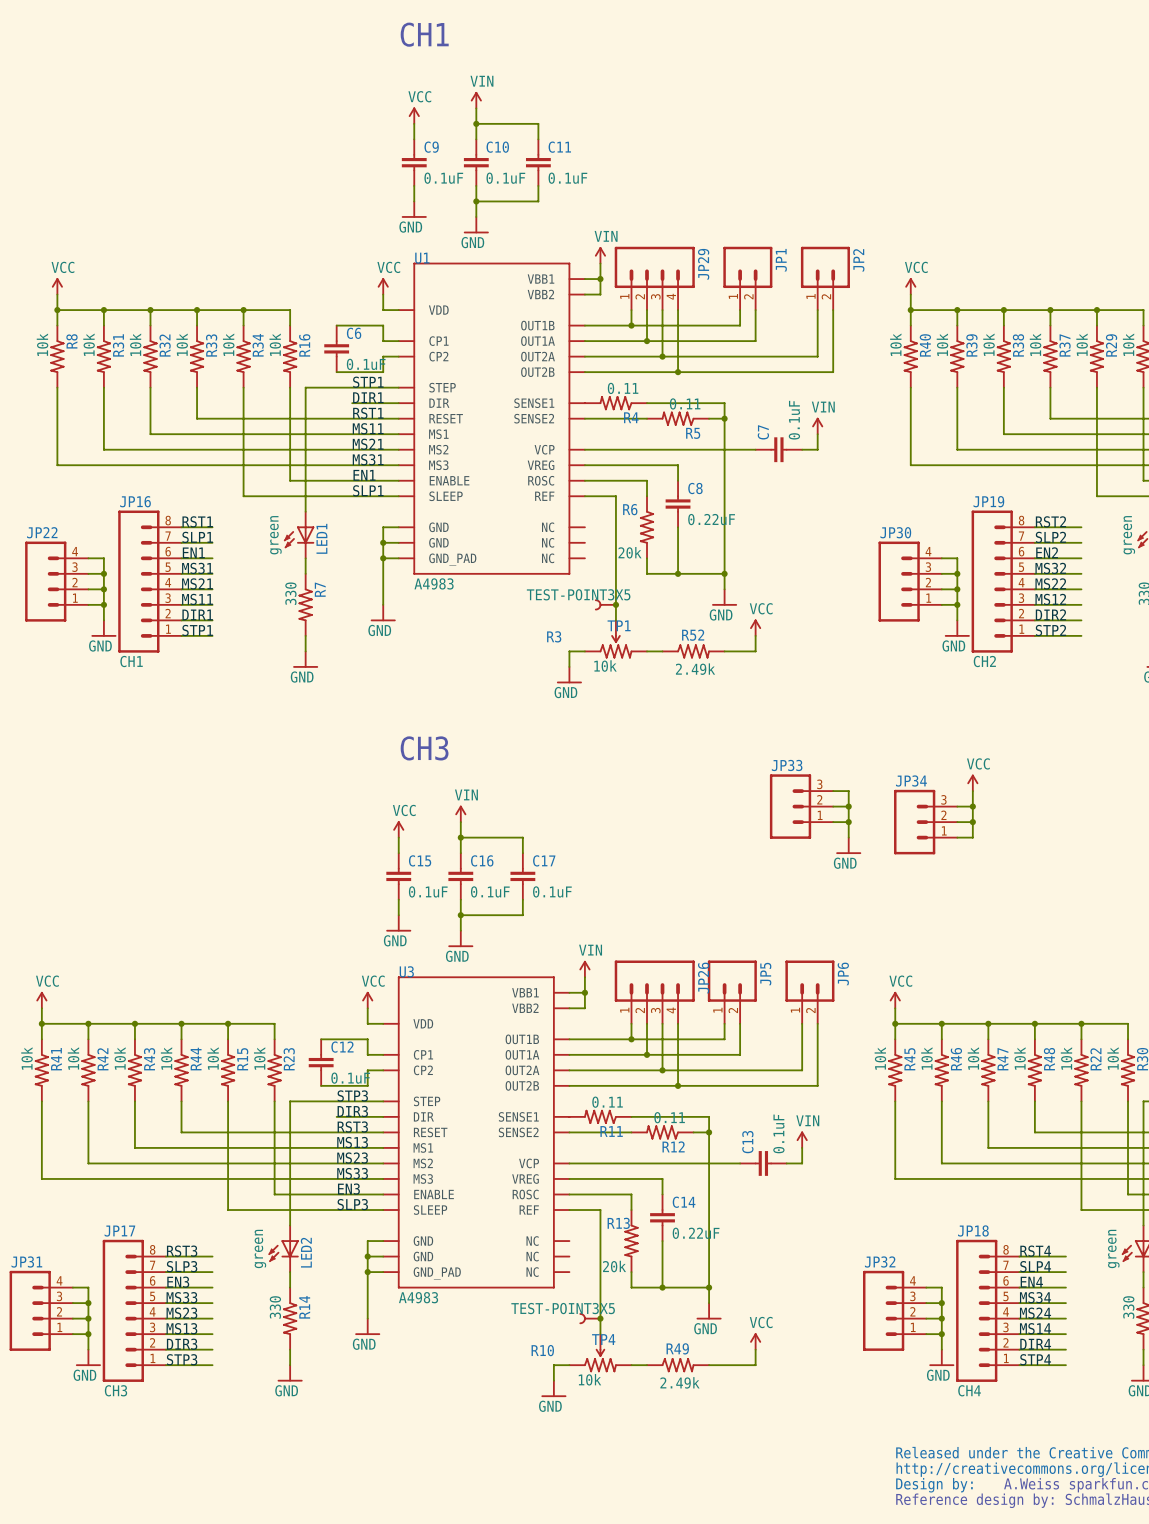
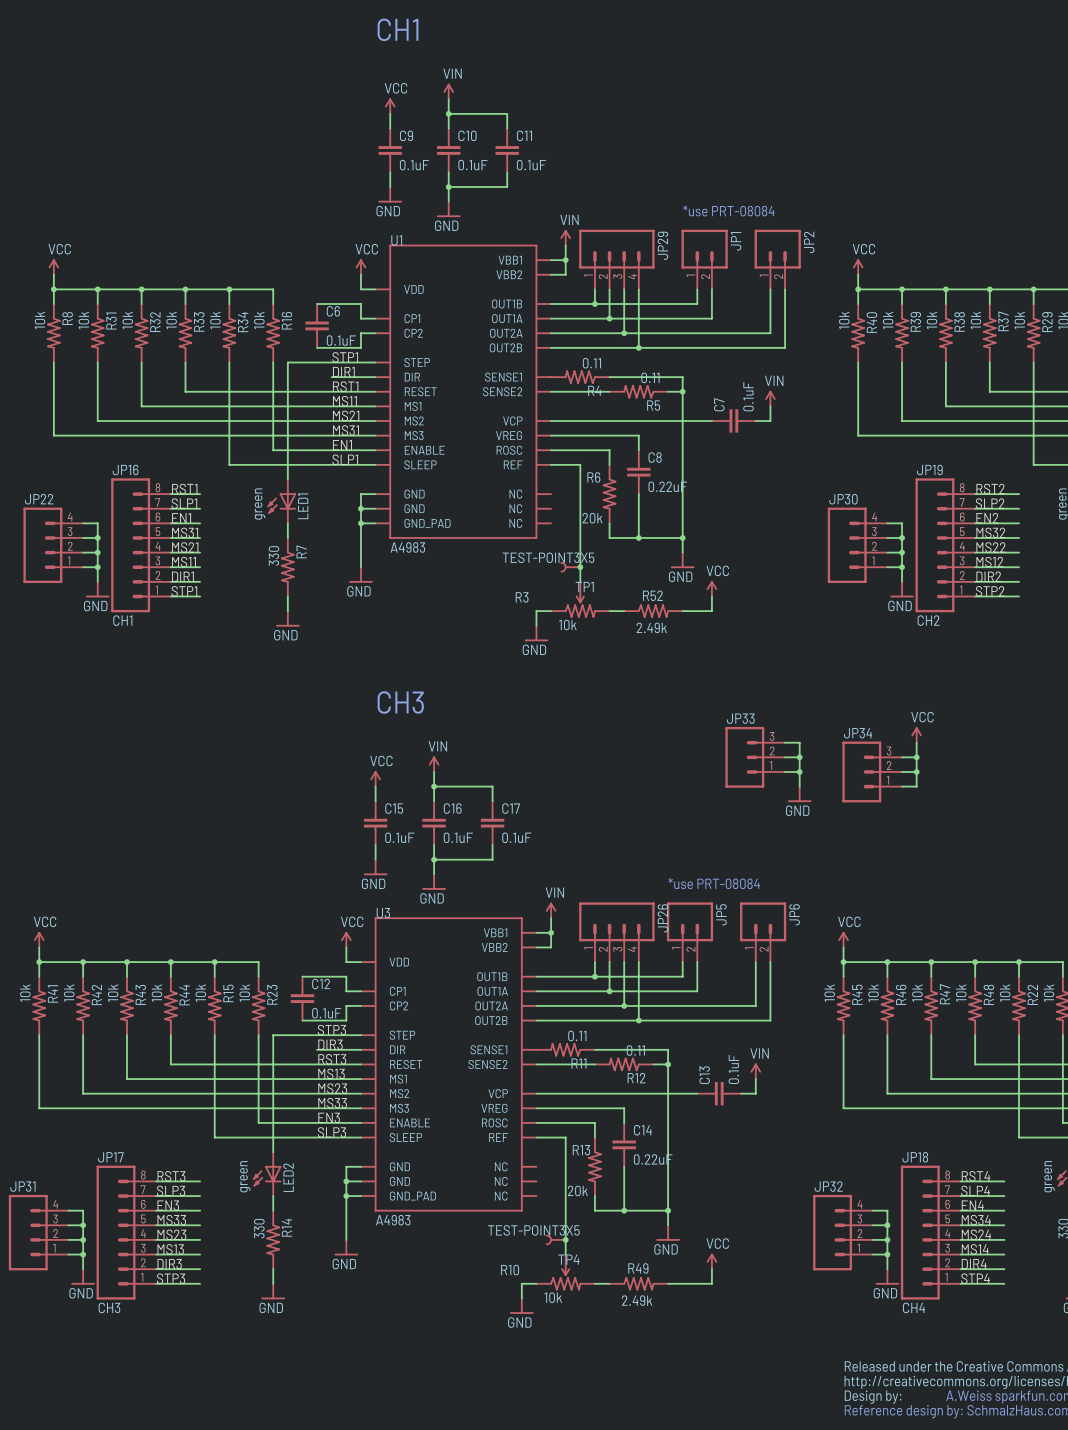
text: none -> *use PRT-08084 (728, 210)
text: none -> *use PRT-08084 (714, 883)

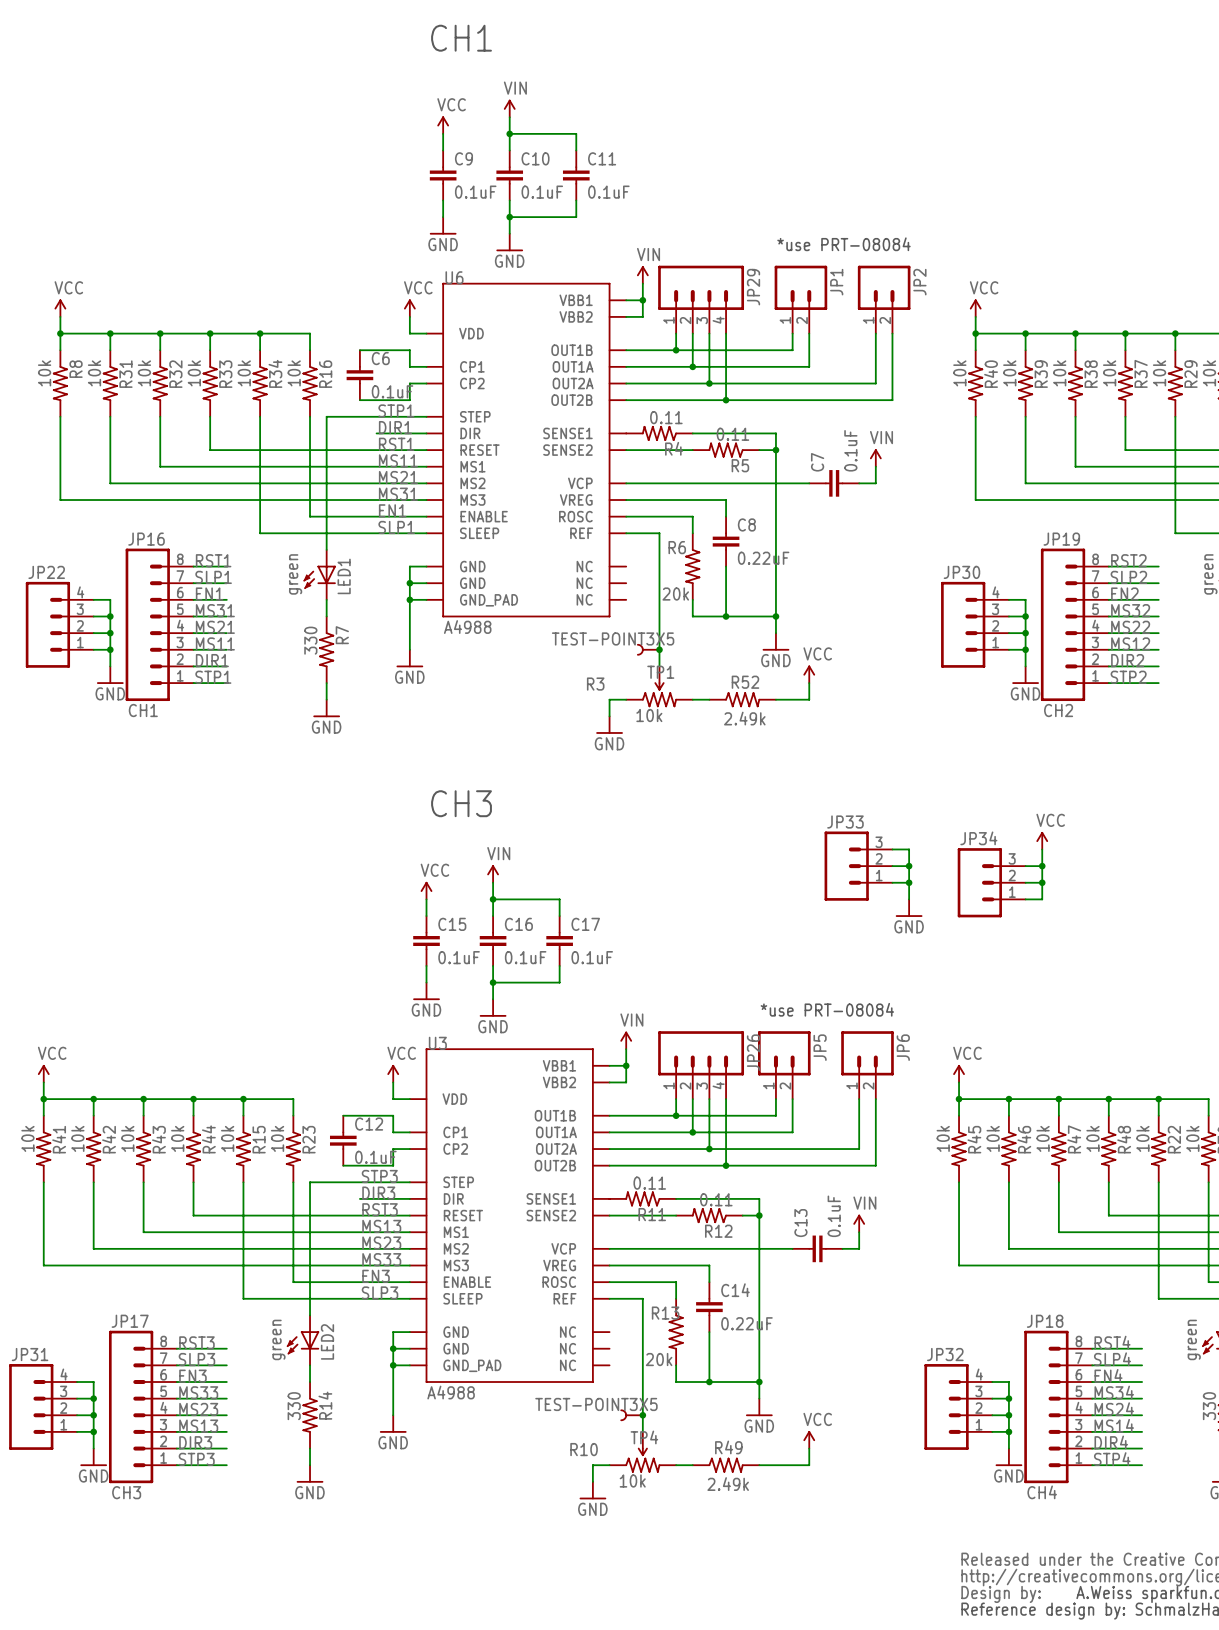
U1 name: U1 (396, 240) -> U6 (454, 277)
U1 value: A4983 (407, 547) -> A4988 (467, 627)
U3 value: A4983 (393, 1220) -> A4988 (451, 1392)

